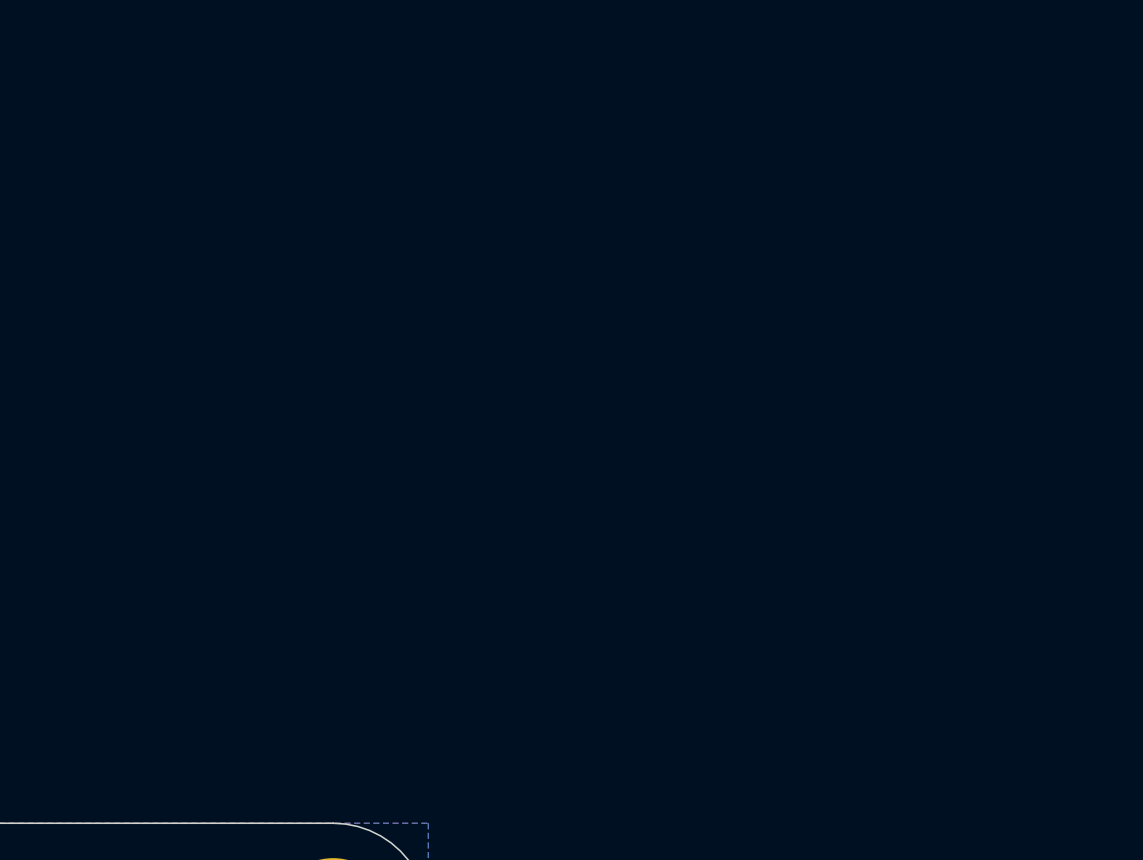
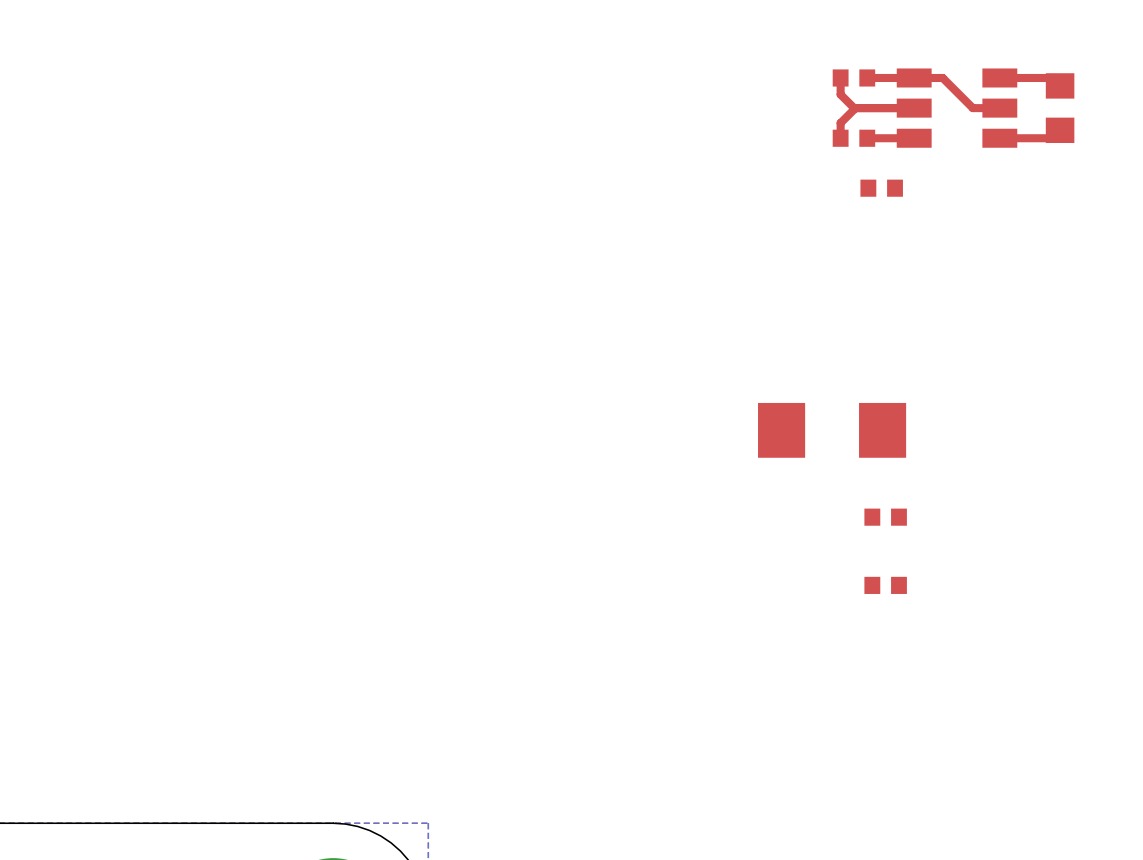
top track: none -> (840, 77) (840, 94) (854, 108) (914, 108)
part: none -> (853, 77)
top track: none -> (867, 77) (942, 77) (972, 108) (999, 108)
top track: none -> (999, 77) (1053, 77) (1060, 84)
top track: none -> (855, 108) (840, 123) (840, 138)
part: none -> (957, 108)
part: none -> (1060, 108)
top track: none -> (1060, 128) (1050, 138) (999, 138)
part: none -> (853, 138)
top track: none -> (914, 138) (867, 138)
part: none -> (881, 188)
part: none -> (832, 430)
part: none -> (885, 517)
part: none -> (885, 585)

